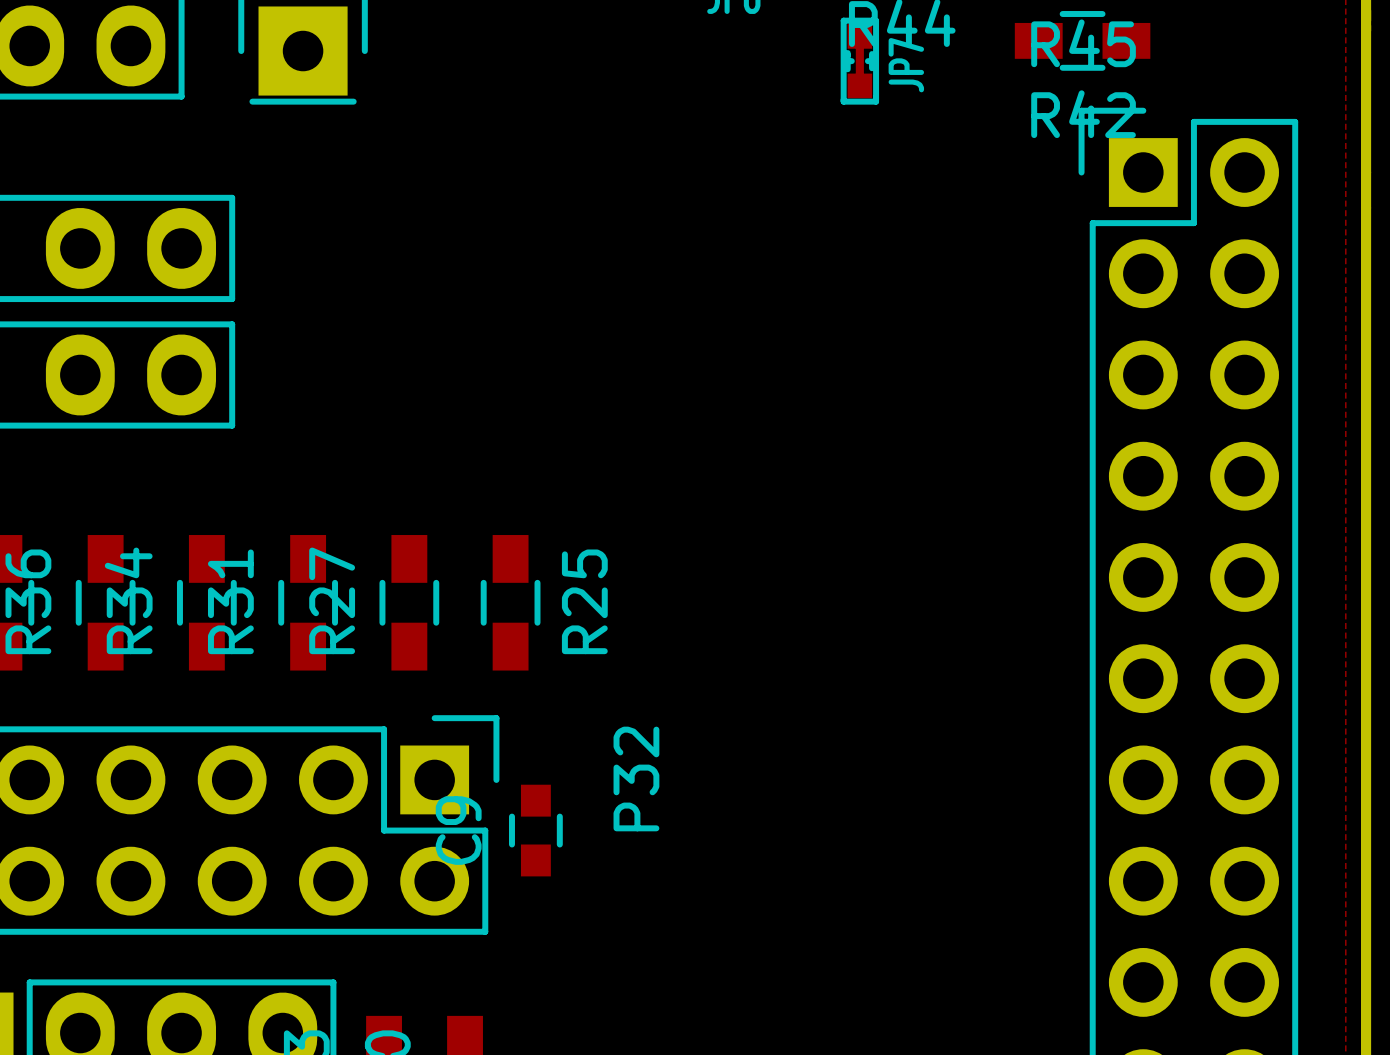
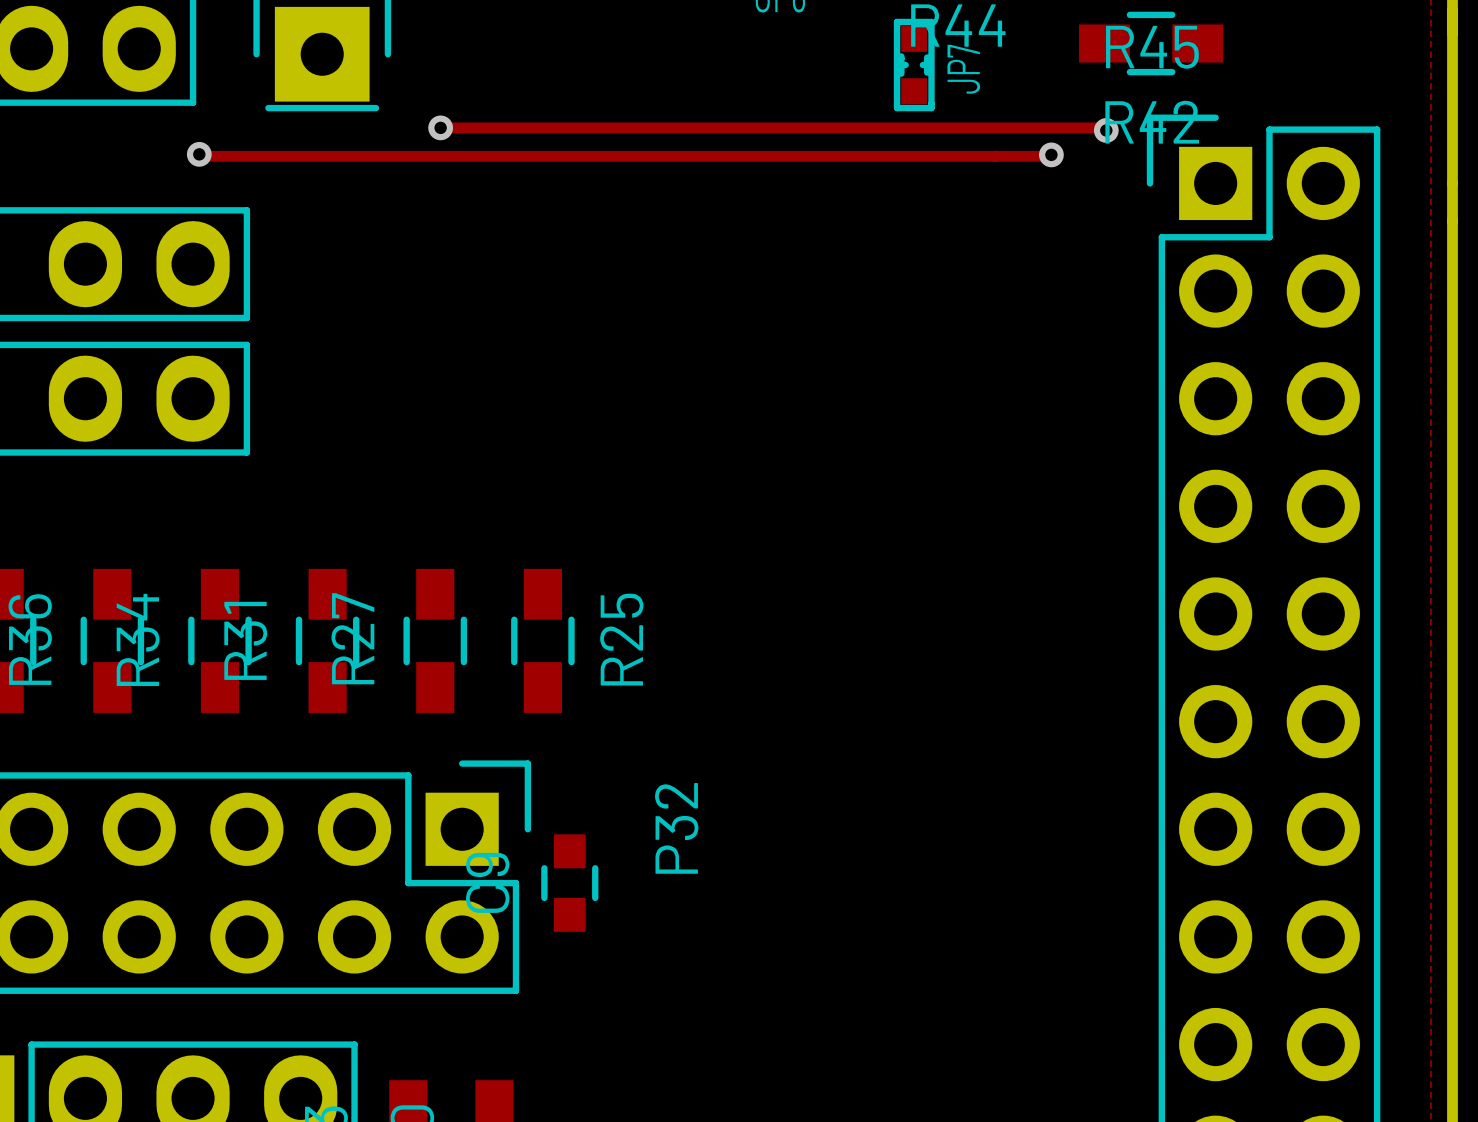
JP7 footprint: [840, 17, 880, 105] -> [893, 18, 935, 112]
track: none -> (440, 127) (1103, 127) (1106, 130)
via: none -> (440, 127)
via: none -> (1106, 130)
track: none -> (199, 154) (201, 156) (1051, 154)
via: none -> (199, 154)
via: none -> (1051, 154)

